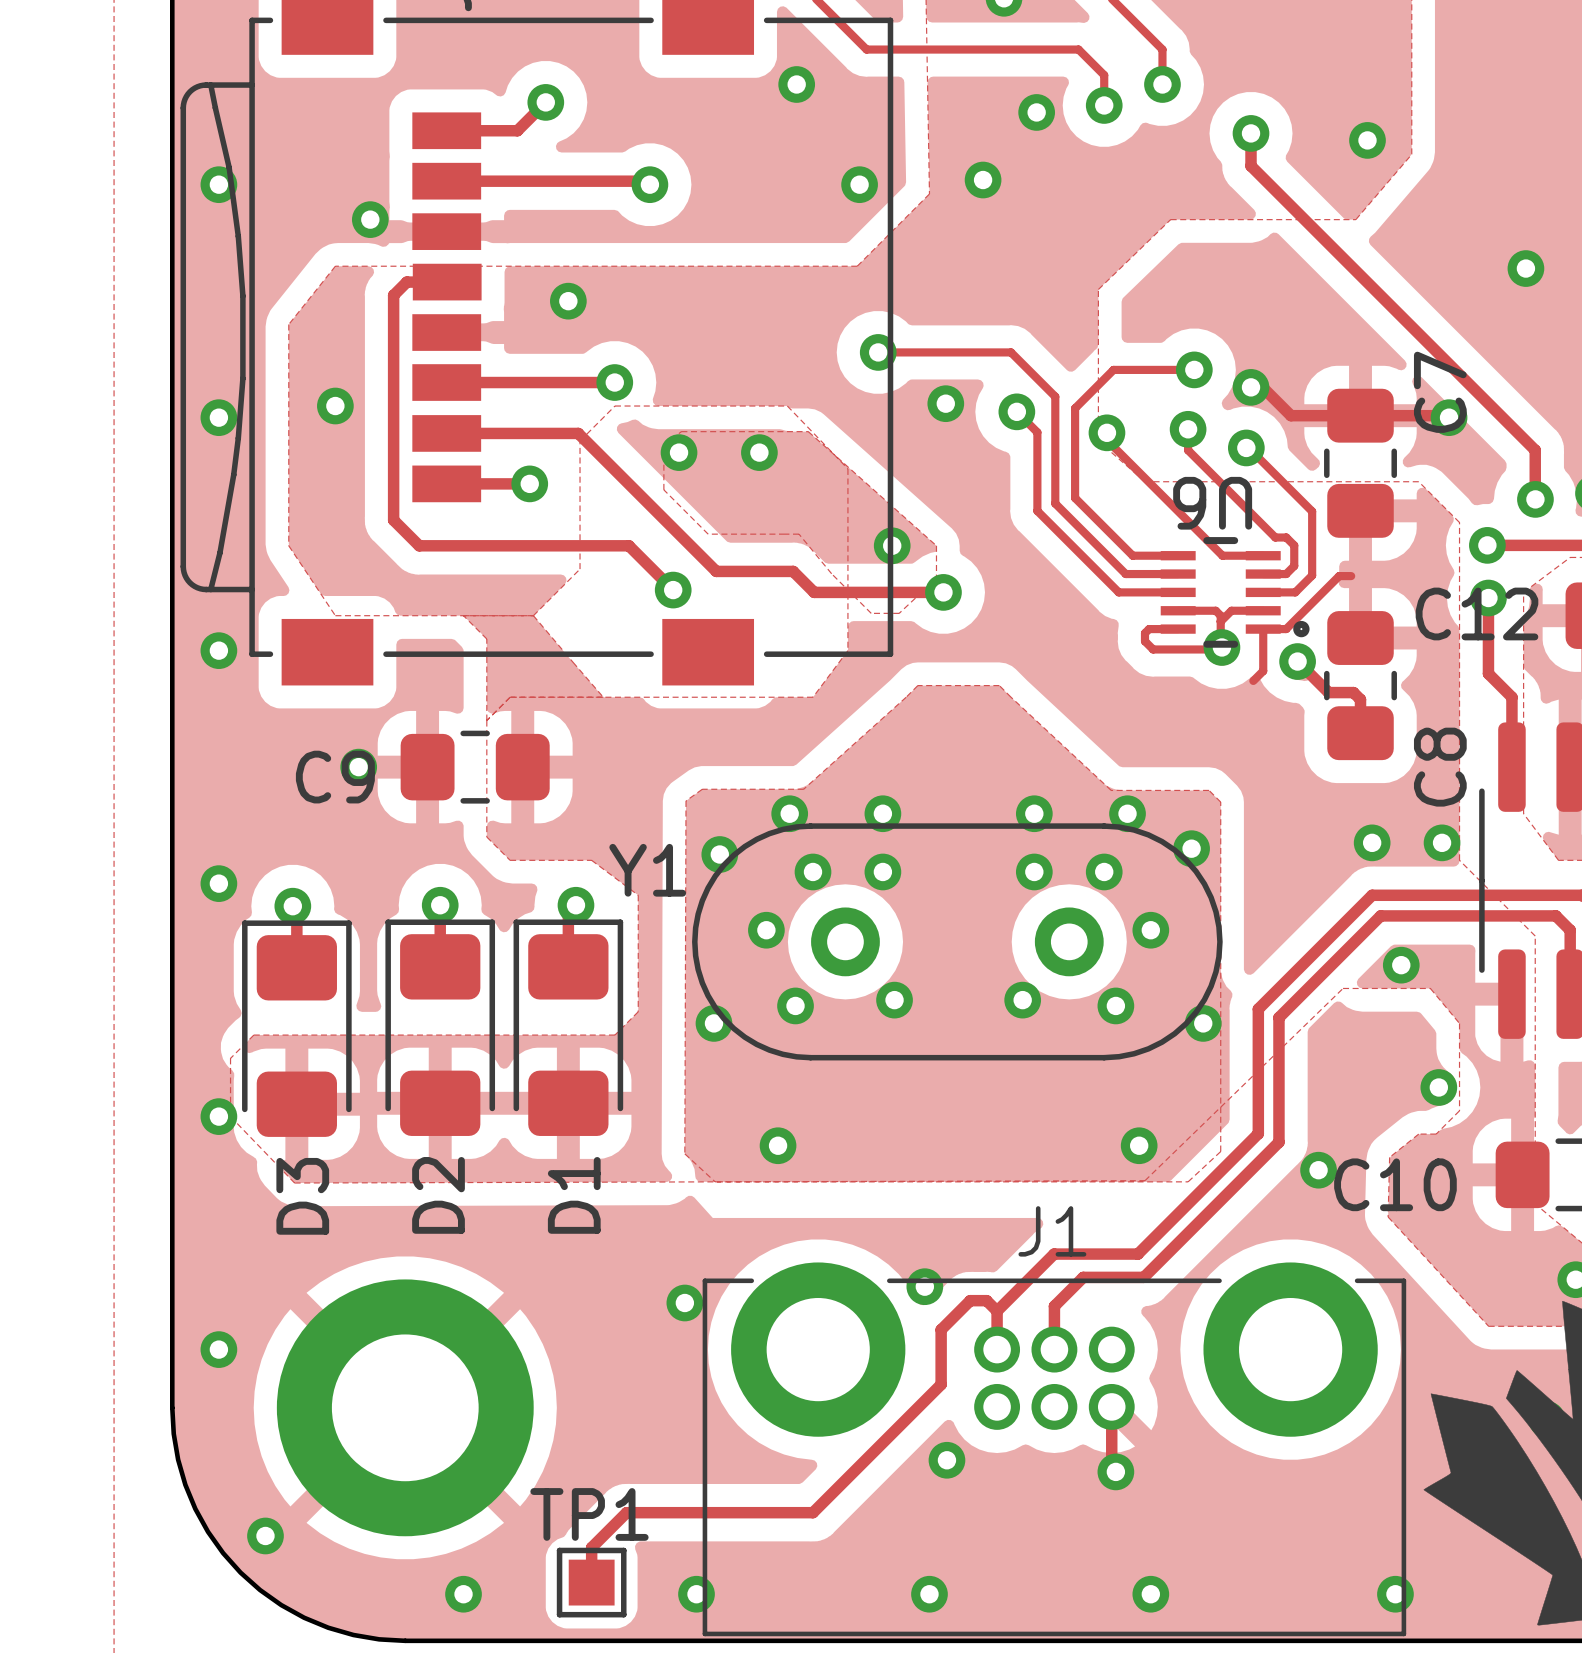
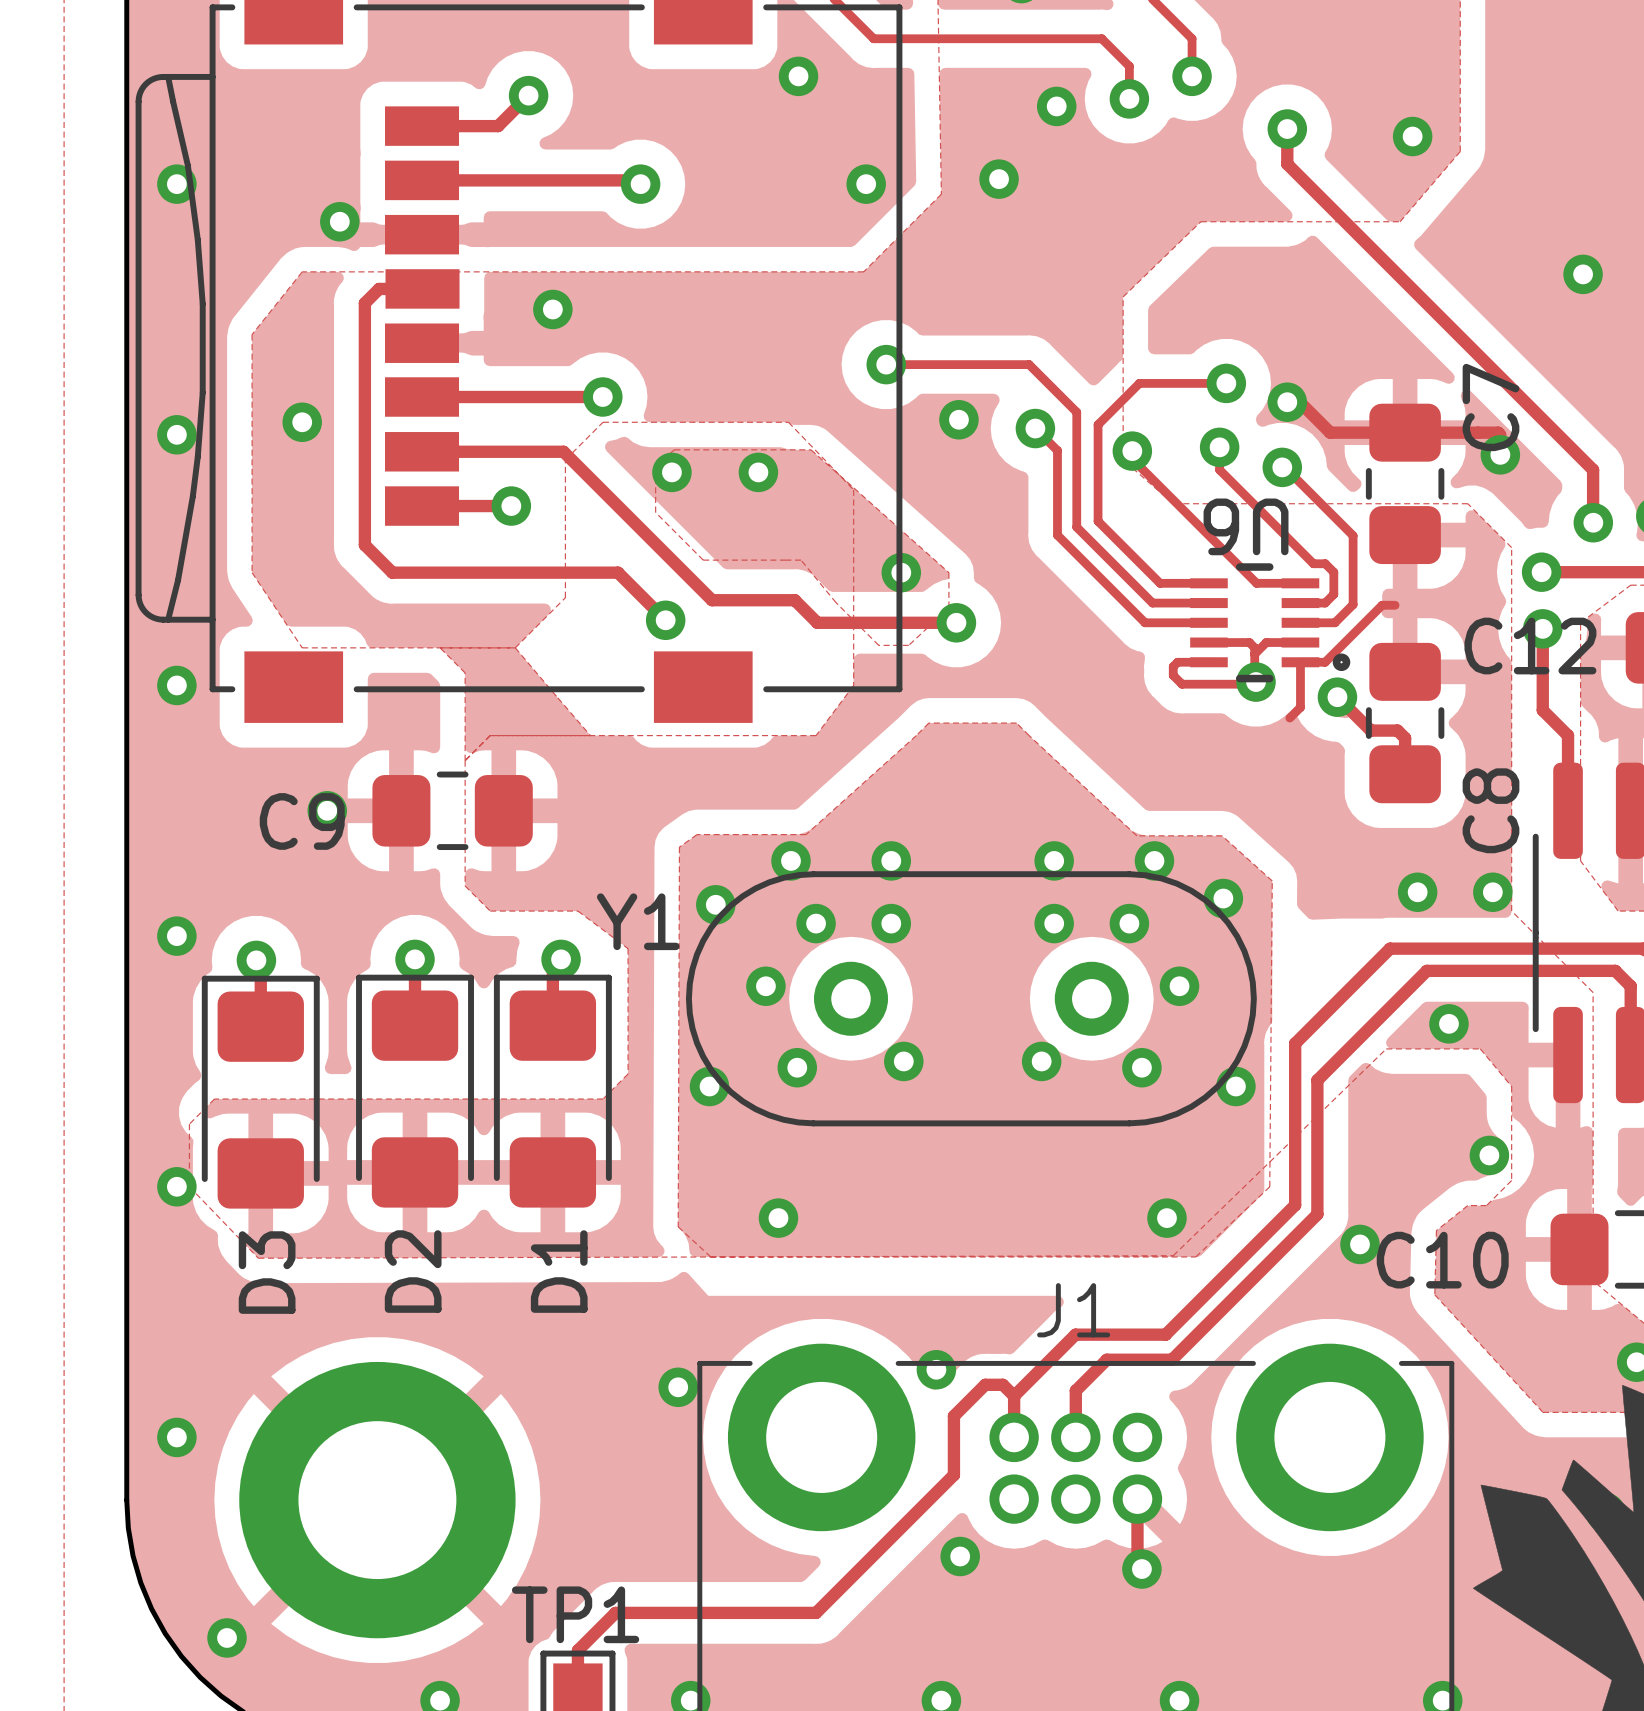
via position: (1449, 417) -> (1500, 454)
zone outline: (1190, 790) (1209, 790) (1220, 802) (1220, 1151) (1188, 1181) (1165, 1181) -> (1222, 835) (1272, 880) (1269, 1186) (1195, 1256)
track: (1372, 895) (1258, 1009) -> (1417, 948) (1390, 948) (1295, 1043) (1295, 1071)

